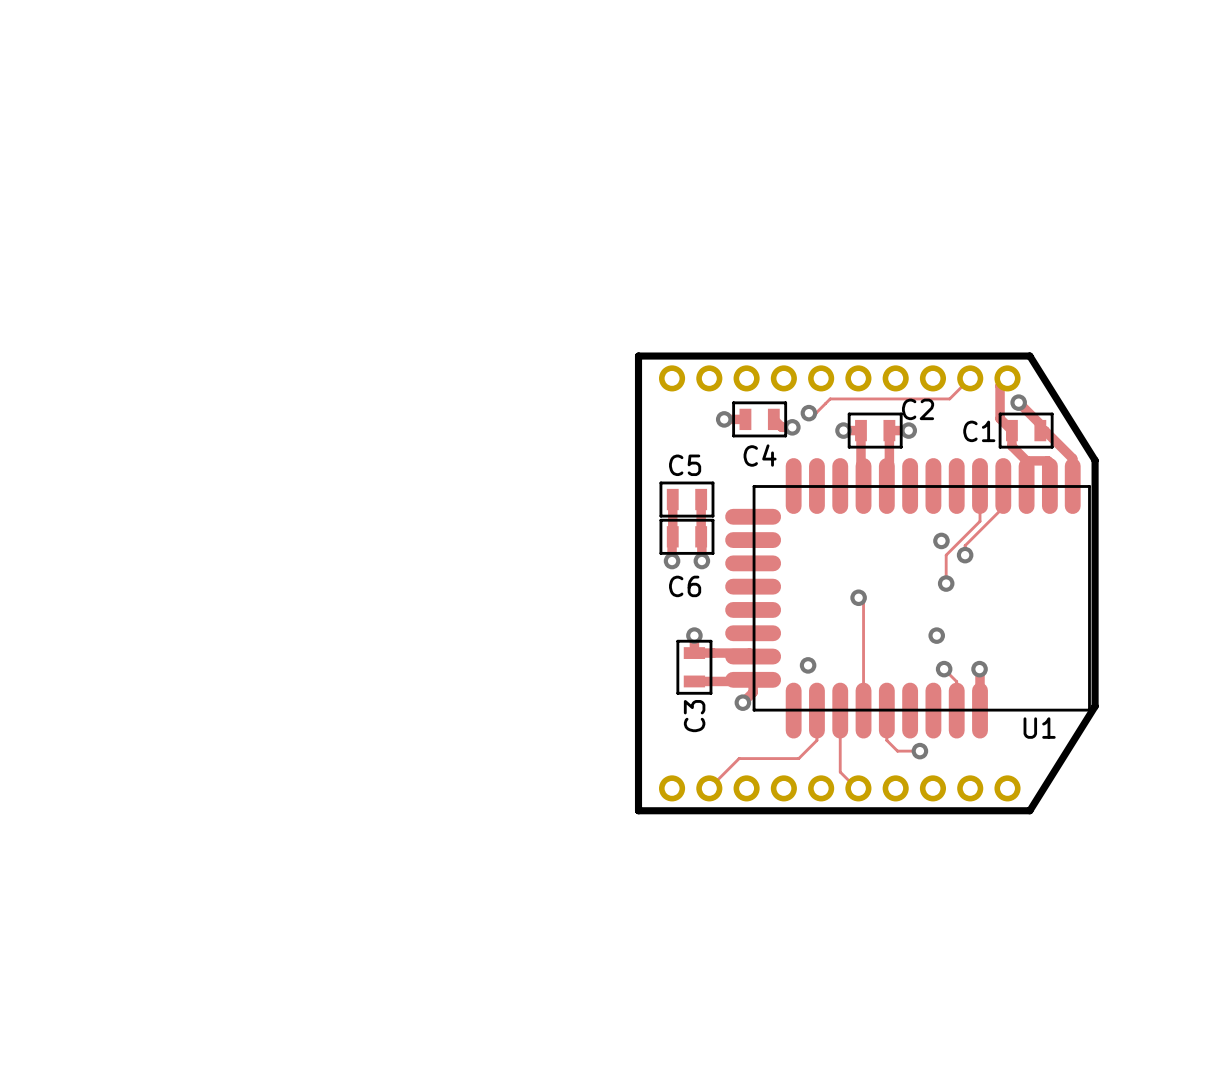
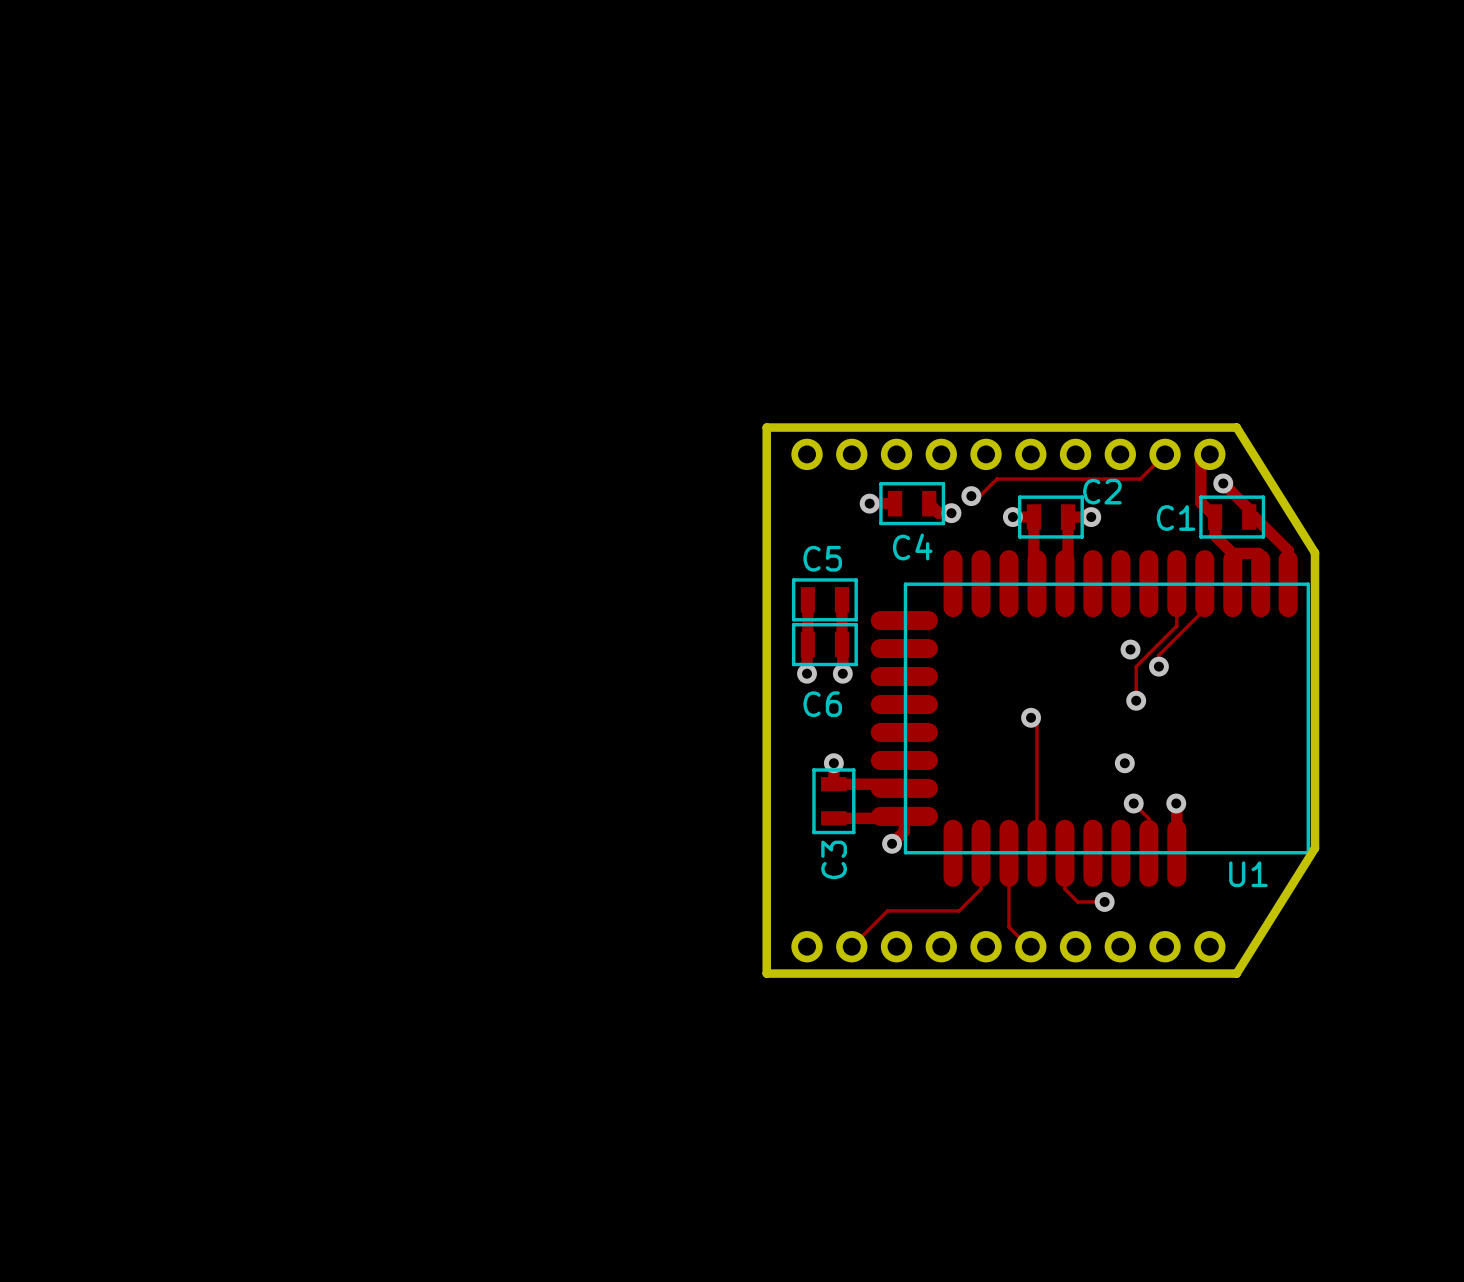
via: (808, 665) -> none

